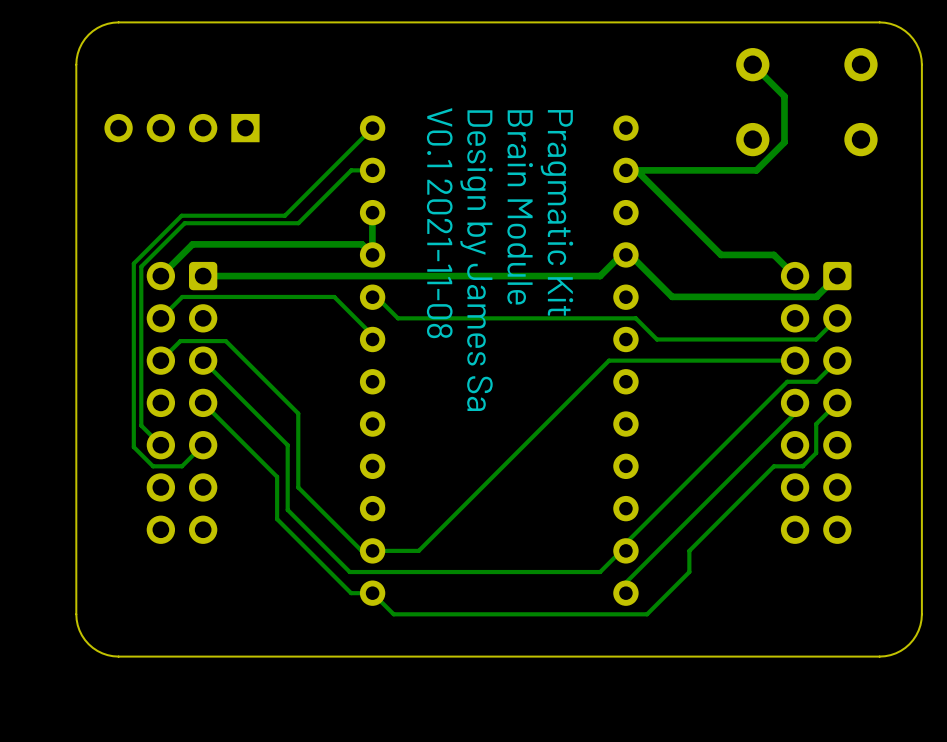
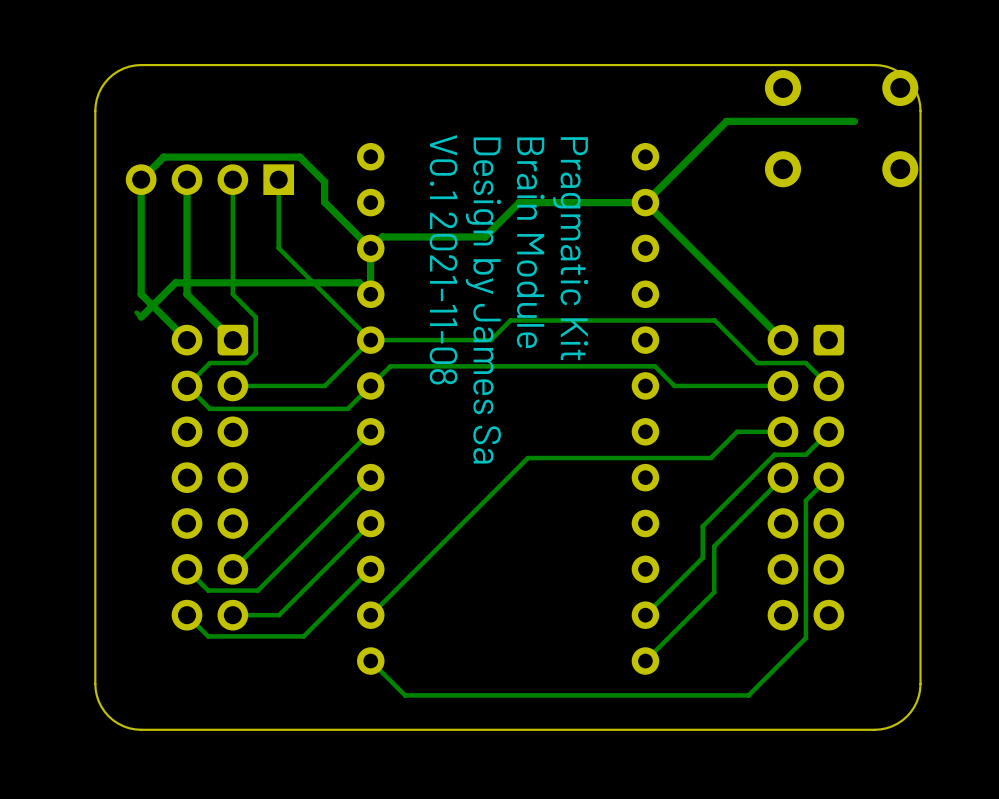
track: (752, 64) (784, 96) (784, 142) (756, 170) (630, 170) (625, 165) (632, 165) (721, 254) (773, 254) (795, 276) -> none
track: none -> (854, 121) (726, 121) (645, 202)
part position: (182, 128) -> (209, 179)
track: (372, 128) (284, 215) (181, 215) (133, 263) (133, 447) (153, 466) (182, 466) (203, 445) -> none
track: none -> (187, 179) (187, 294) (232, 340)
track: none -> (278, 179) (278, 248) (370, 340)
track: (372, 170) (351, 170) (298, 223) (184, 223) (141, 266) (141, 425) (160, 445) -> none
track: none -> (645, 202) (782, 340)
track: none -> (645, 202) (519, 202) (484, 236) (382, 236) (370, 248) (324, 202) (324, 181) (299, 157) (163, 157) (141, 179) (141, 294) (187, 340)
track: (198, 271) (203, 276) (600, 276) (625, 250) (672, 296) (816, 296) (837, 276) -> none
track: (372, 292) (397, 318) (635, 318) (656, 339) -> (232, 179) (232, 294) (255, 317) (255, 353) (246, 363) (209, 363) (187, 385) (209, 408) (347, 408) (390, 366) (654, 366) (674, 385) (679, 385)
track: none -> (370, 340) (324, 385) (232, 385)
track: none -> (370, 340) (490, 340) (510, 320) (714, 320) (757, 363) (805, 363) (828, 385)
track: (160, 318) (182, 296) (334, 296) (372, 335) -> none
track: (837, 318) (816, 339) (752, 339) -> none
track: (795, 360) (609, 360) (418, 550) (361, 550) (298, 487) (298, 413) (225, 341) (180, 341) (160, 360) -> none
track: (837, 360) (816, 381) (787, 381) (625, 543) (625, 546) (600, 572) (349, 572) (287, 509) (287, 445) (203, 360) -> none
track: none -> (370, 431) (233, 569)
track: none -> (782, 431) (737, 431) (710, 458) (527, 458) (370, 615)
track: none -> (828, 431) (805, 454) (774, 454) (702, 526) (702, 557) (645, 615)
part position: (182, 402) -> (209, 477)
track: (203, 402) (277, 476) (277, 519) (351, 593) (372, 593) -> none
track: (795, 402) (795, 413) (625, 582) (625, 588) -> none
part position: (816, 402) -> (805, 477)
track: (837, 402) (816, 424) (816, 453) (802, 466) (773, 466) (689, 550) (689, 572) (647, 614) (393, 614) -> (828, 477) (805, 500) (805, 638) (748, 695) (405, 695) (393, 683)
track: none -> (370, 477) (257, 590) (208, 590) (187, 569)
track: none -> (782, 477) (714, 546) (714, 592) (645, 661)
track: none -> (370, 523) (279, 615) (232, 615)
track: none -> (370, 569) (303, 636) (208, 636) (187, 615)
board edge: (837, 656) (879, 656) (895, 653) (913, 640) (921, 619) (921, 64) (920, 53) (913, 38) (900, 28) (885, 22) (118, 22) (107, 23) (92, 31) (81, 43) (76, 64) (76, 619) (85, 640) (102, 653) (118, 656) (160, 656) -> (874, 729) (892, 726) (907, 716) (917, 701) (920, 683) (920, 110) (917, 93) (907, 78) (892, 68) (874, 65) (141, 65) (123, 68) (108, 78) (98, 93) (95, 110) (95, 689) (98, 701) (108, 716) (123, 726) (141, 729)

